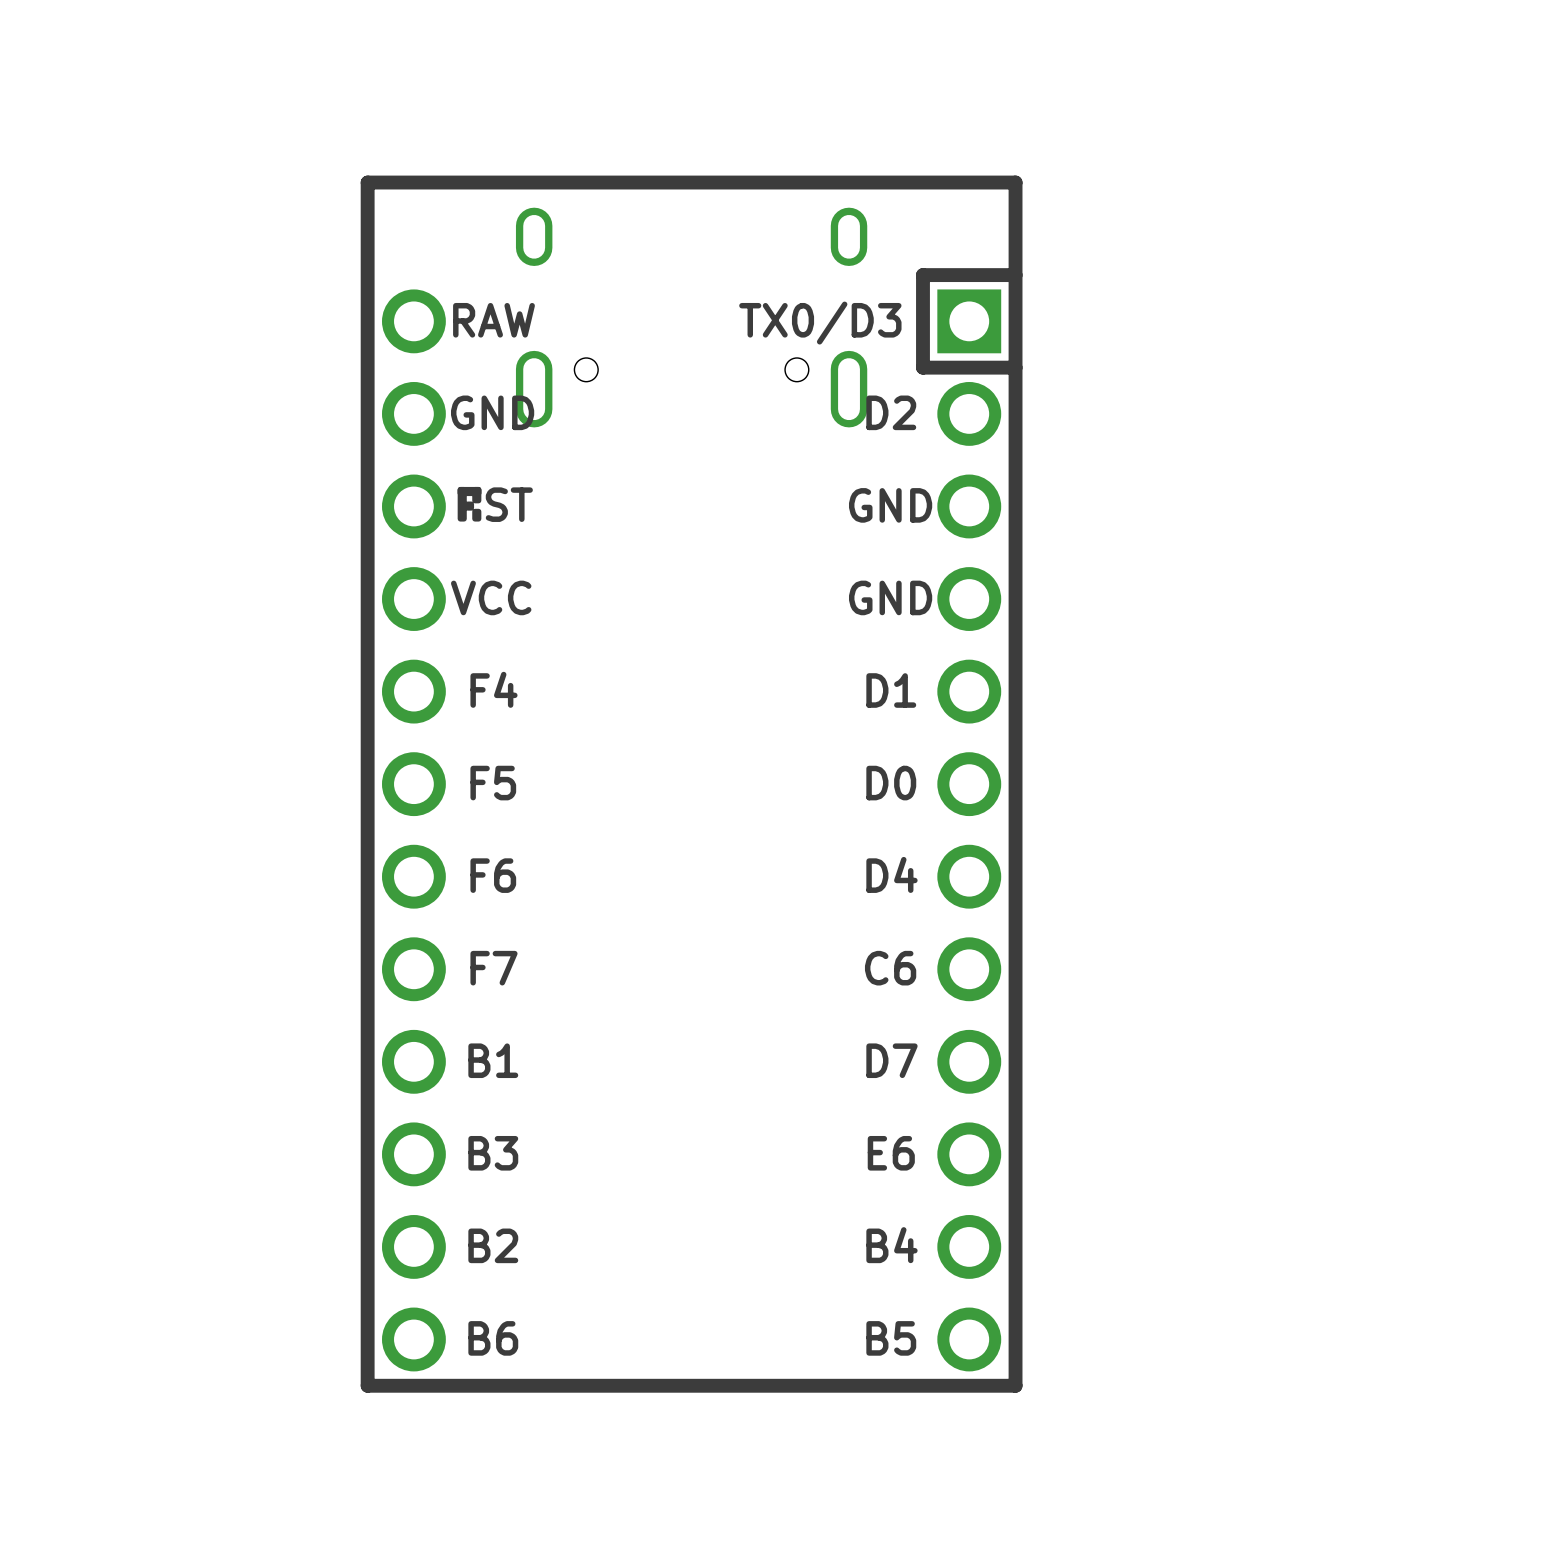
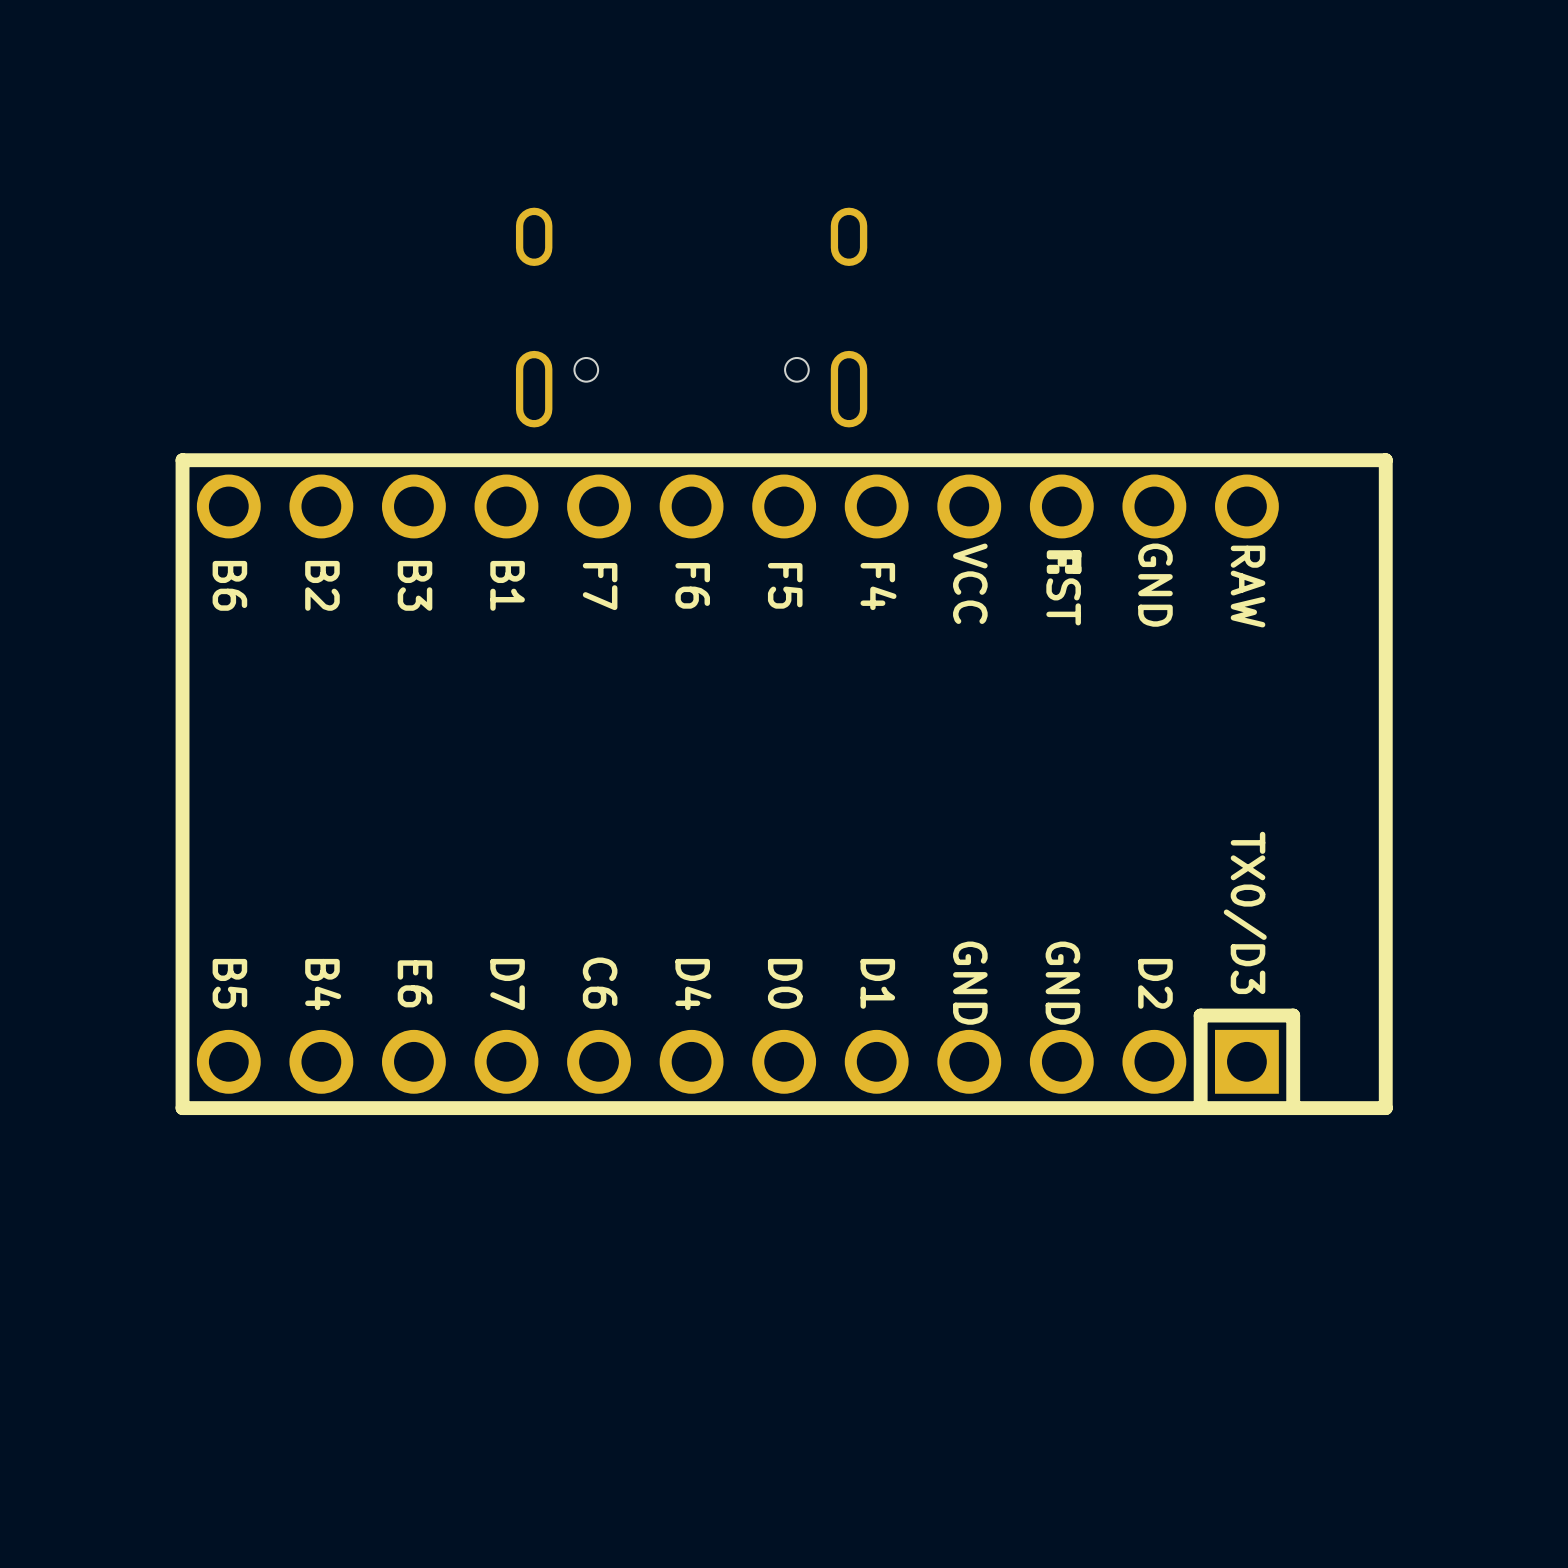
part rotation: 0° (691, 784) -> 90° clockwise (784, 784)

